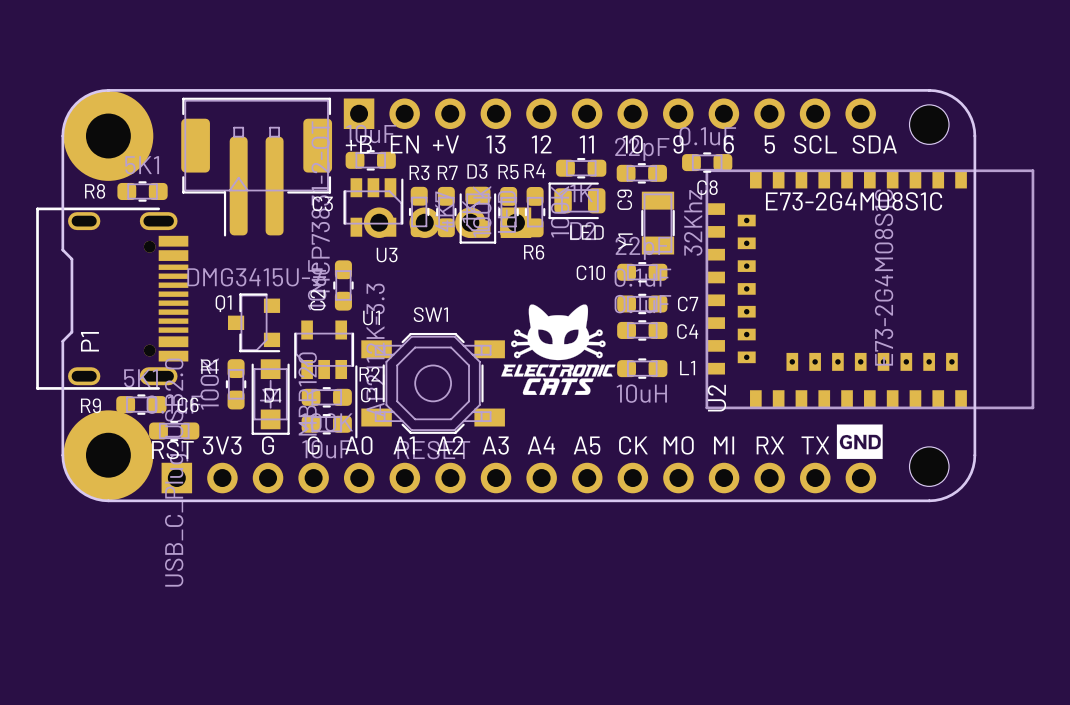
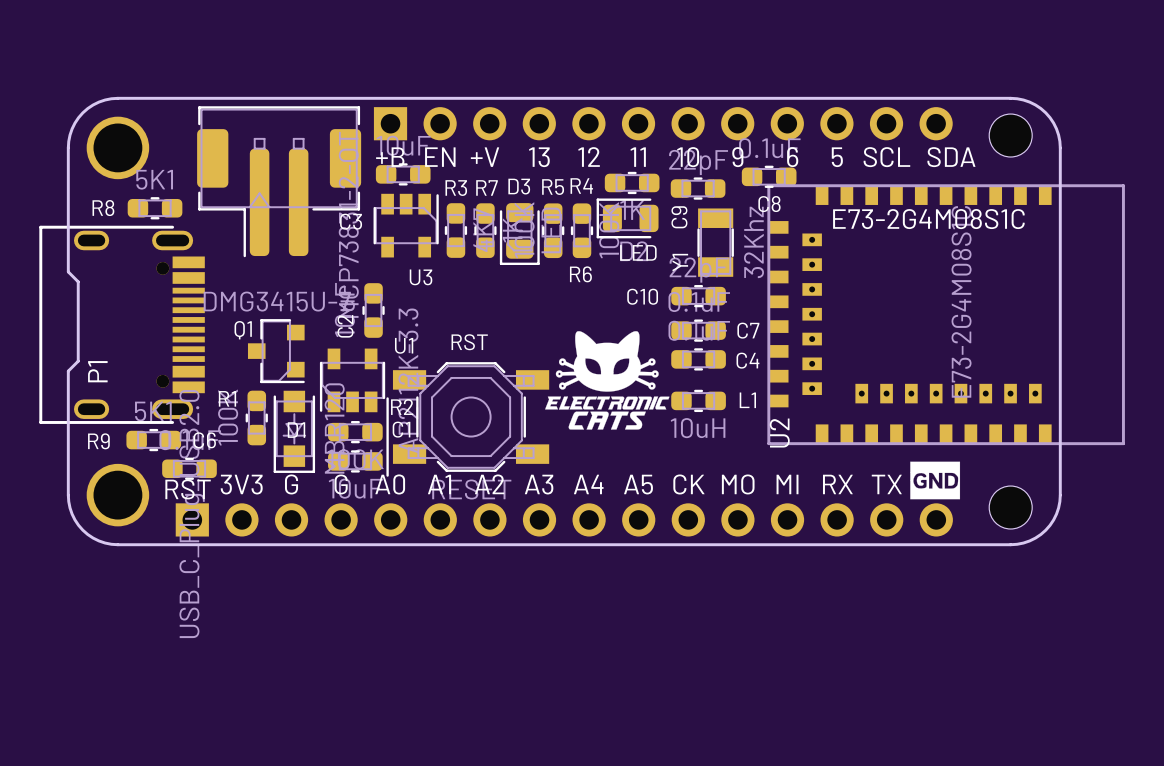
part footprint: [63, 91, 154, 181] -> [86, 116, 150, 180]
part: (447, 222) -> none
SW1 name: SW1 (430, 314) -> RST (469, 342)
part footprint: [63, 410, 154, 501] -> [86, 463, 150, 527]

